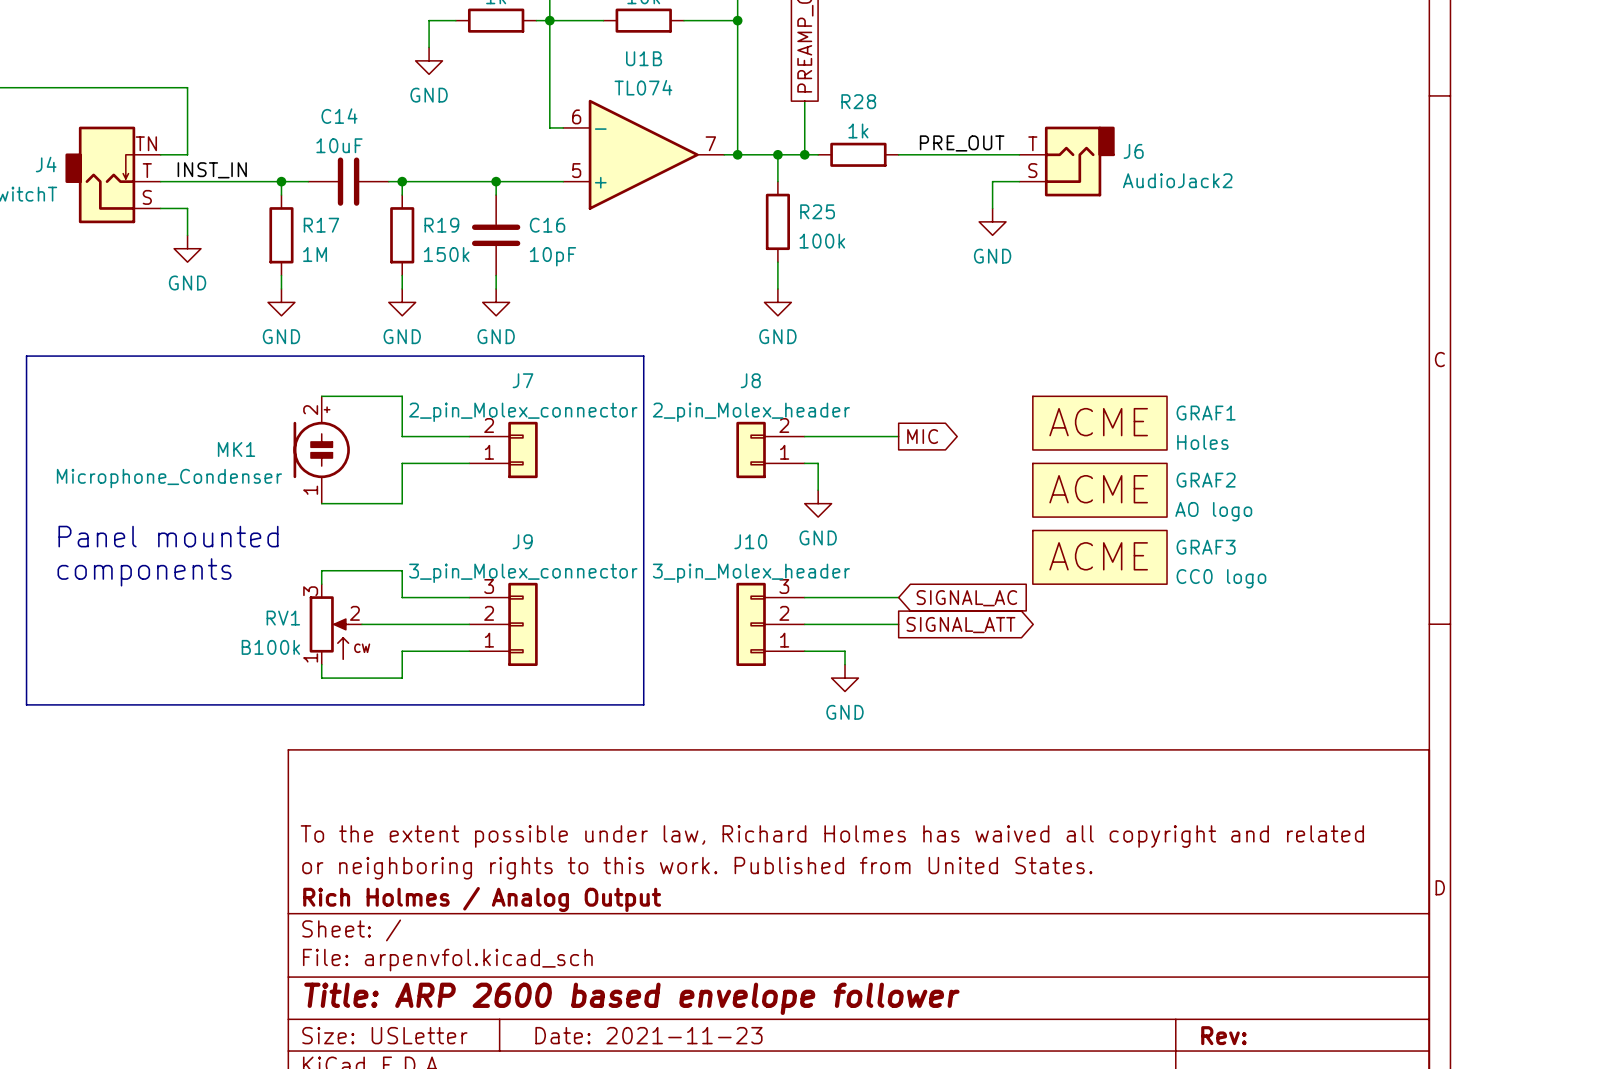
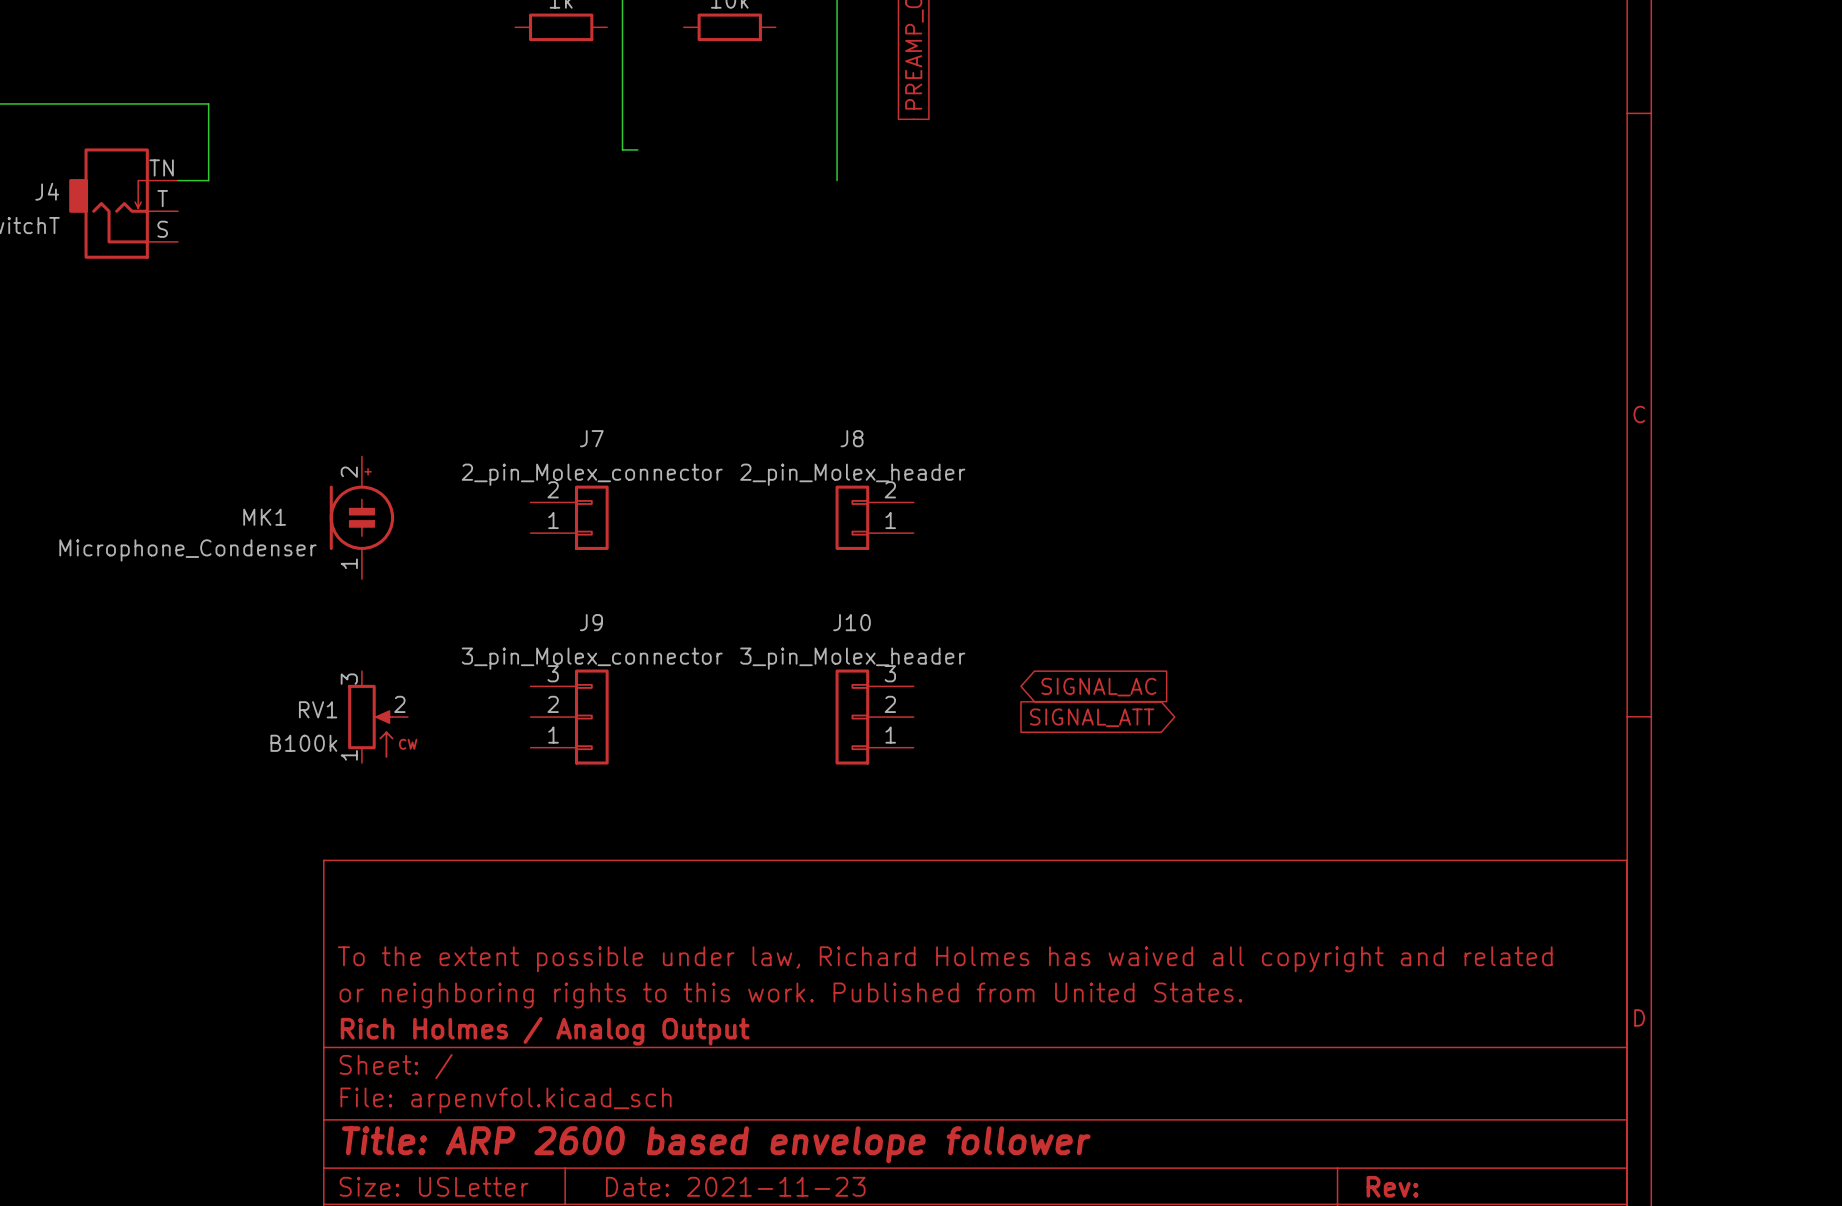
wire: (455, 20) (429, 20) (429, 47) -> none
wire: (536, 20) (603, 20) -> none
junction: (549, 20) -> none
wire: (683, 20) (737, 20) -> none
junction: (737, 20) -> none
power symbol: GND (429, 60) -> none
wire: (804, 101) (804, 154) -> none
label: PRE_OUT (962, 143) -> none
U1B: TL074 (643, 154) -> none
wire: (724, 154) (818, 154) -> none
junction: (737, 154) -> none
wire: (777, 154) (777, 181) -> none
junction: (777, 154) -> none
junction: (804, 154) -> none
R28: 1k (858, 154) -> none
wire: (898, 154) (1019, 154) -> none
J6: AudioJack2 (1067, 161) -> none
label: INST_IN (212, 170) -> none
wire: (160, 181) (308, 181) -> none
wire: (281, 181) (281, 195) -> none
junction: (281, 181) -> none
C14: 10uF (348, 181) -> none
wire: (388, 181) (563, 181) -> none
wire: (402, 181) (402, 195) -> none
junction: (402, 181) -> none
wire: (496, 181) (496, 195) -> none
junction: (496, 181) -> none
wire: (1019, 181) (992, 181) (992, 208) -> none
wire: (160, 208) (187, 208) (187, 235) -> none
R25: 100k (777, 221) -> none
power symbol: GND (992, 221) -> none
R17: 1M (281, 235) -> none
R19: 150k (402, 235) -> none
C16: 10pF (496, 235) -> none
power symbol: GND (187, 248) -> none
wire: (777, 262) (777, 288) -> none
wire: (281, 275) (281, 288) -> none
wire: (402, 275) (402, 288) -> none
wire: (496, 275) (496, 288) -> none
power symbol: GND (281, 302) -> none
power symbol: GND (402, 302) -> none
power symbol: GND (496, 302) -> none
power symbol: GND (777, 302) -> none
line: (26, 356) (26, 704) (643, 704) (643, 356) (26, 356) -> none
wire: (321, 396) (402, 396) (402, 436) (469, 436) -> none
GRAF1: Holes (1099, 423) -> none
wire: (804, 436) (898, 436) -> none
global label: MIC (922, 436) -> none
wire: (469, 463) (402, 463) (402, 503) (321, 503) -> none
wire: (804, 463) (818, 463) (818, 490) -> none
GRAF2: AO logo (1099, 490) -> none
power symbol: GND (818, 503) -> none
text: Panel mounted (168, 536) -> none
GRAF3: CC0 logo (1099, 557) -> none
text: components (144, 572) -> none
wire: (321, 584) (321, 570) (402, 570) (402, 597) (469, 597) -> none
wire: (804, 597) (898, 597) -> none
wire: (361, 624) (469, 624) -> none
wire: (804, 624) (898, 624) -> none
wire: (469, 651) (402, 651) (402, 678) (321, 678) (321, 664) -> none
wire: (804, 651) (845, 651) (845, 664) -> none
power symbol: GND (845, 678) -> none

